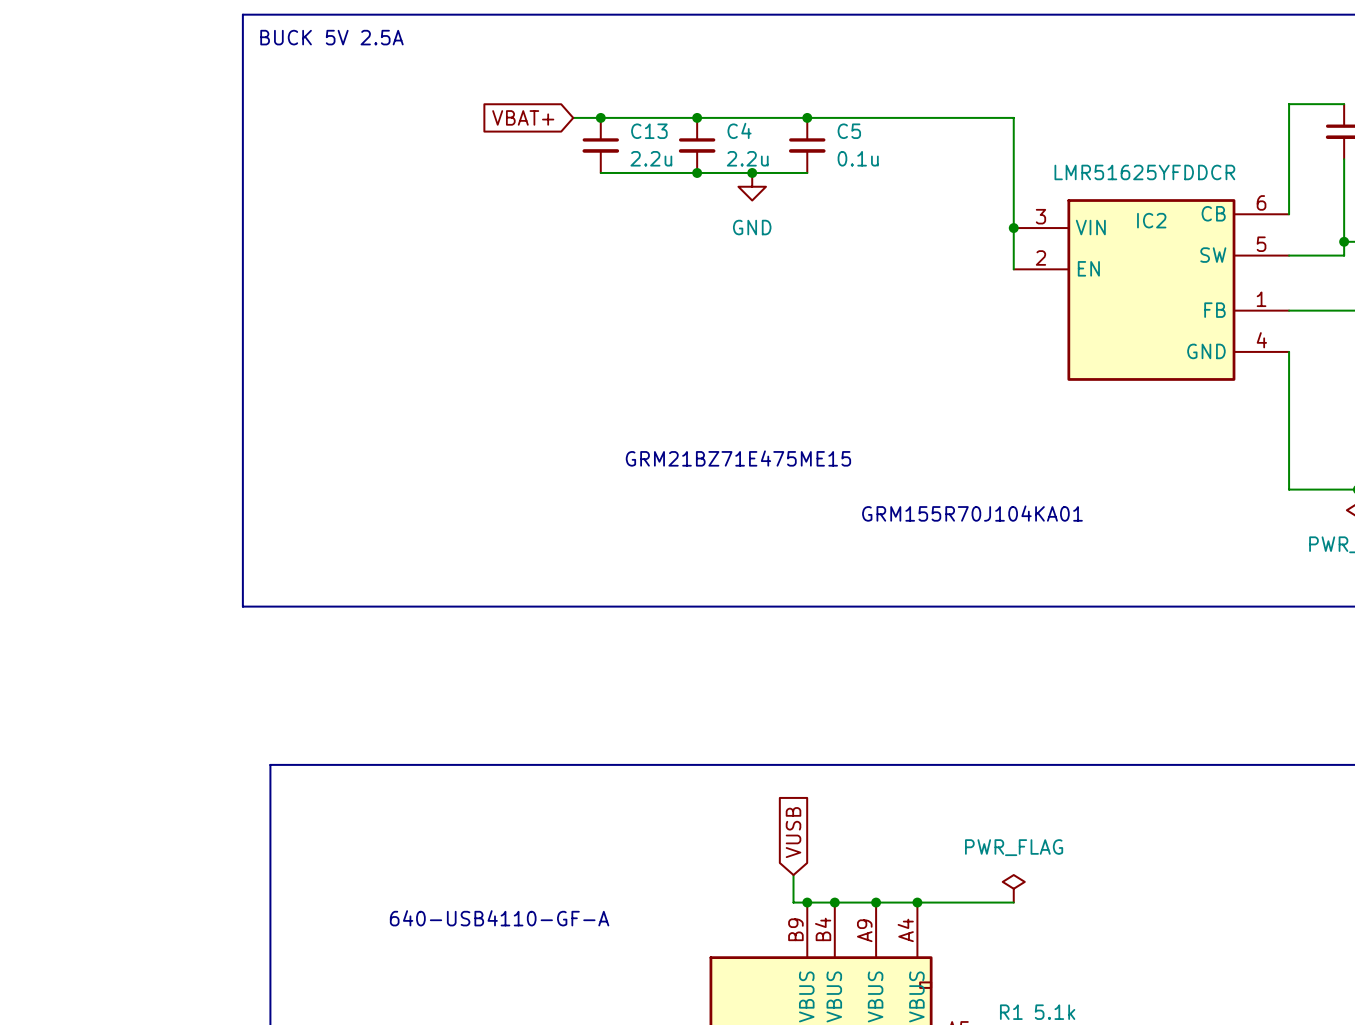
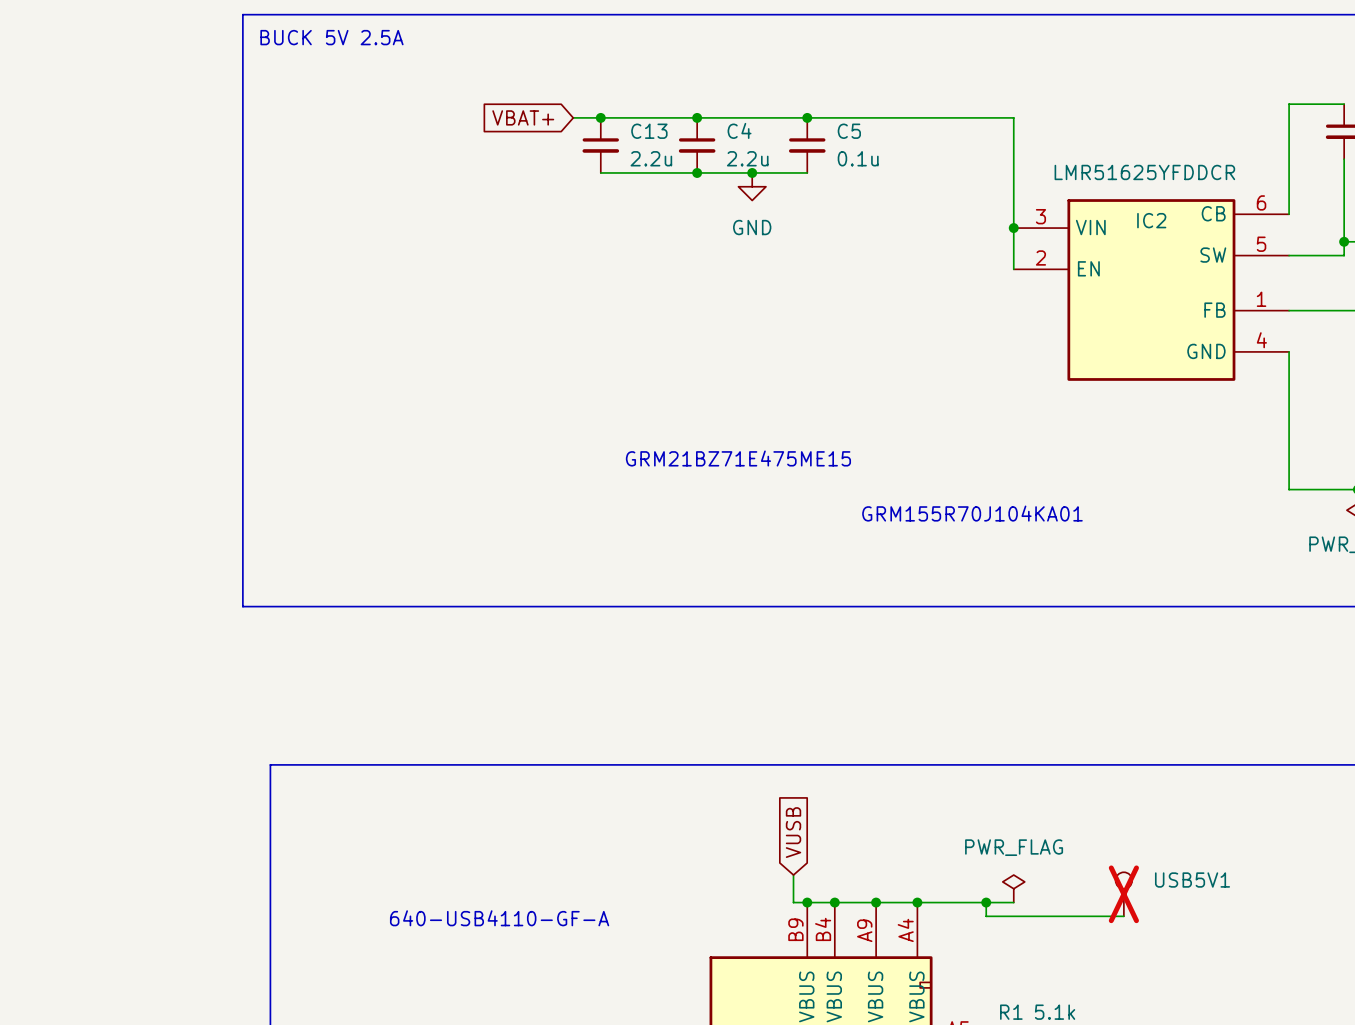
USB5V1: none -> (1123, 894)
wire: none -> (986, 902) (986, 916) (1123, 916)
junction: none -> (986, 902)

